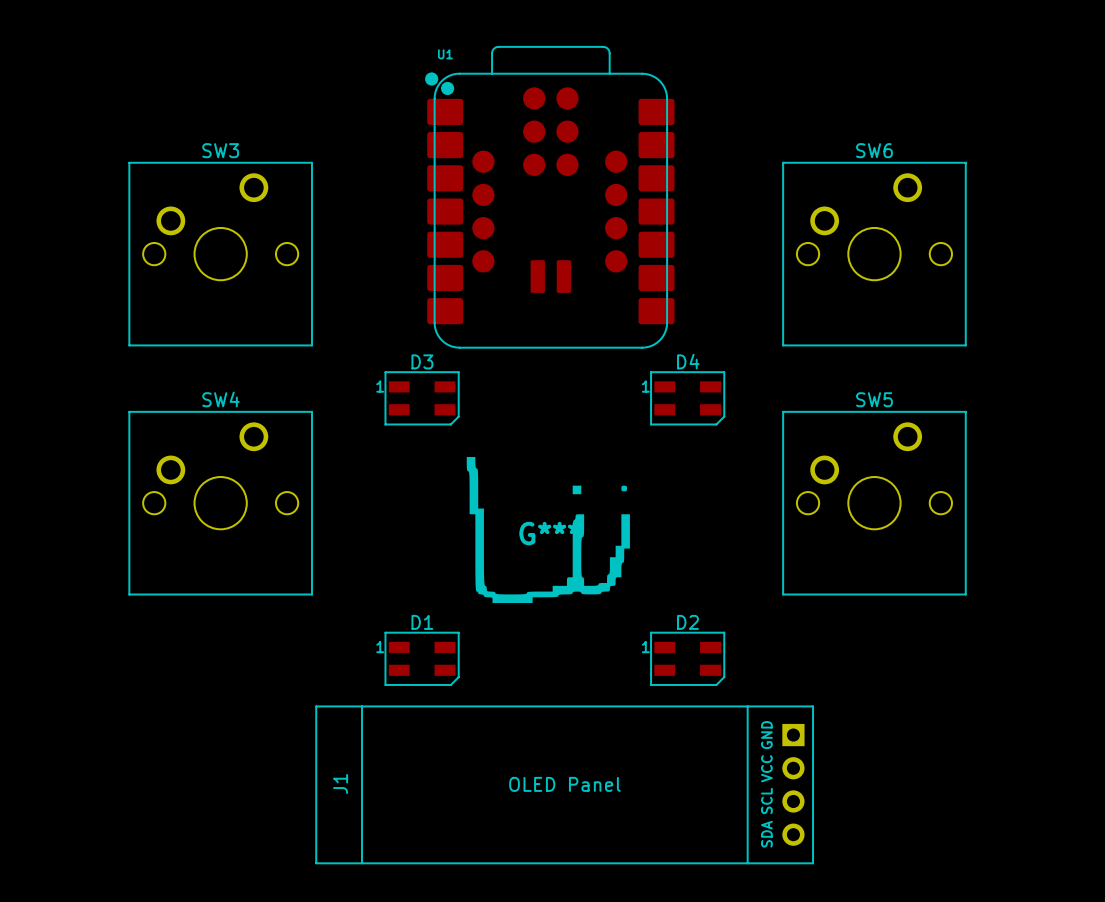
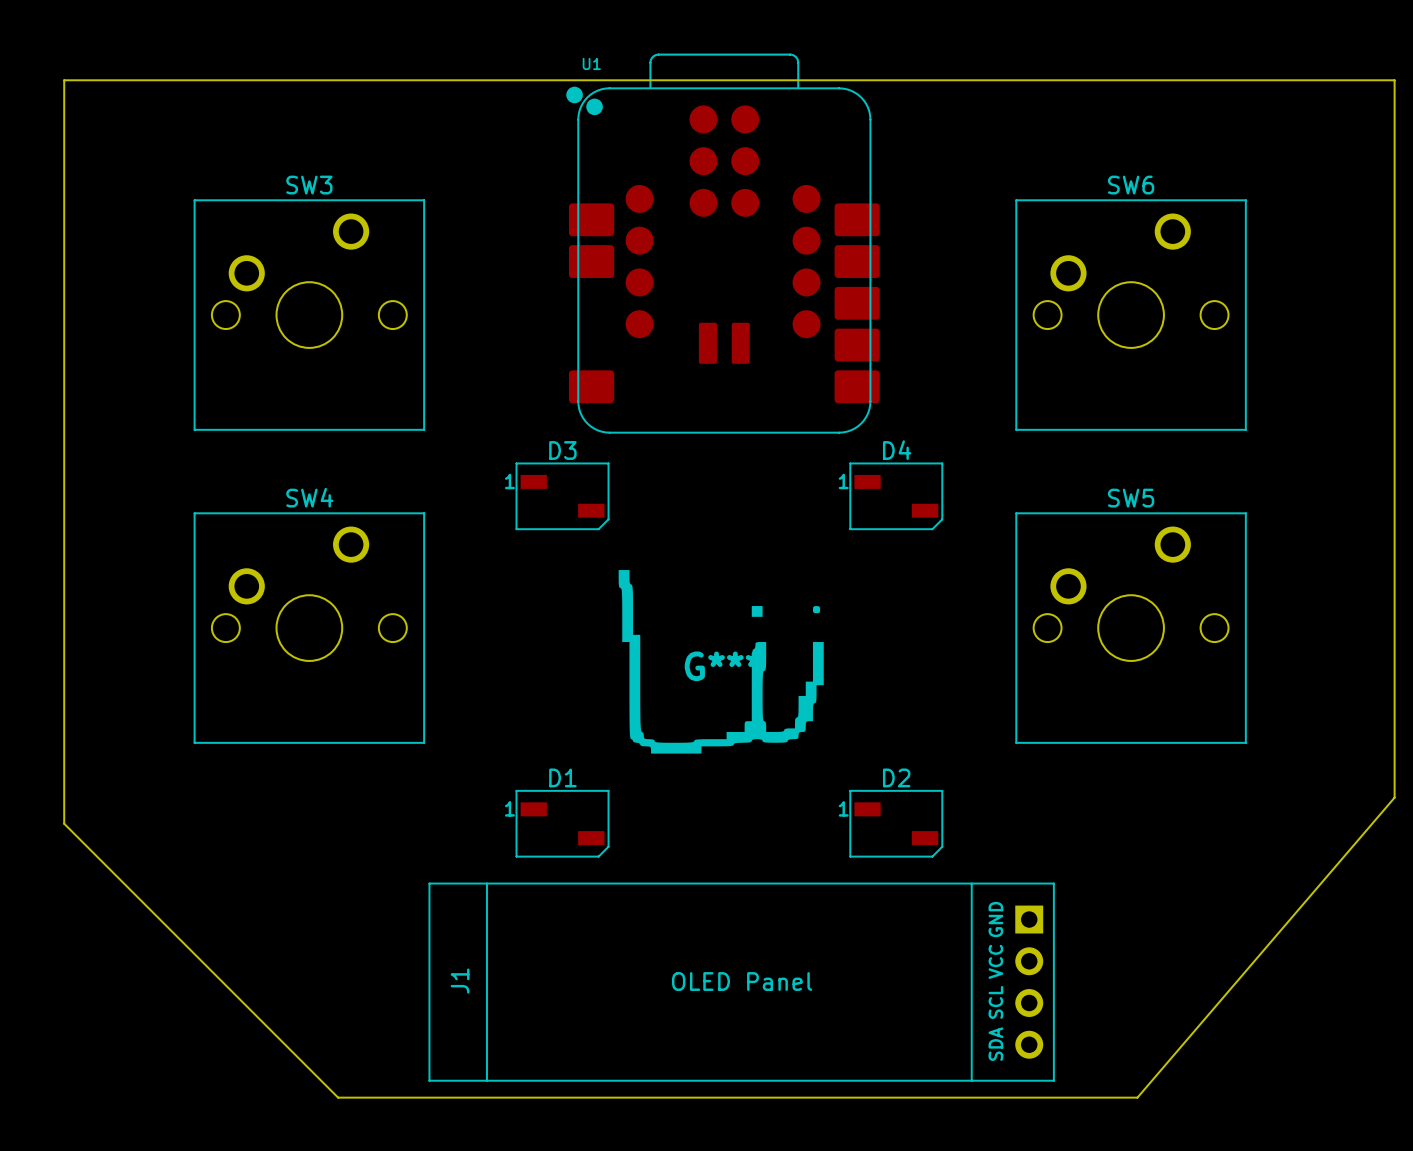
U1 footprint: [425, 46, 675, 349] -> [566, 53, 880, 434]
board edge: none -> (64, 80) (64, 823) (338, 1097) (1137, 1097) (1394, 797) (1394, 80) (64, 80)
D3 footprint: [384, 371, 460, 426] -> [515, 462, 610, 531]
D4 footprint: [650, 371, 726, 426] -> [849, 462, 944, 531]
D1 footprint: [384, 631, 460, 686] -> [515, 789, 610, 858]
D2 footprint: [650, 631, 726, 686] -> [849, 789, 944, 858]

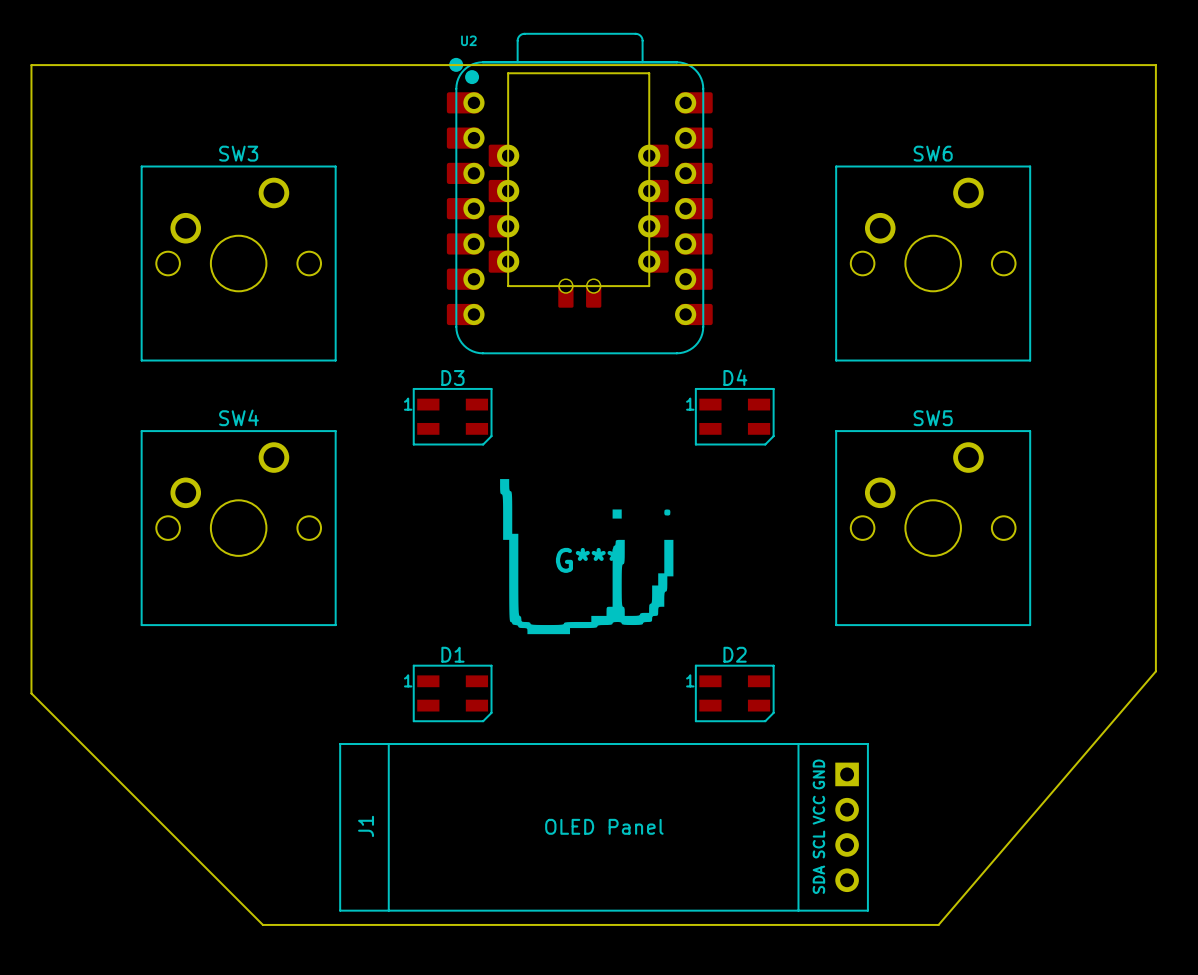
U2: none -> (579, 193)
U1: (723, 243) -> none
D3 footprint: [515, 462, 610, 531] -> [412, 388, 493, 446]
D4 footprint: [849, 462, 944, 531] -> [695, 388, 775, 446]
D1 footprint: [515, 789, 610, 858] -> [412, 664, 493, 723]
D2 footprint: [849, 789, 944, 858] -> [695, 664, 775, 723]

